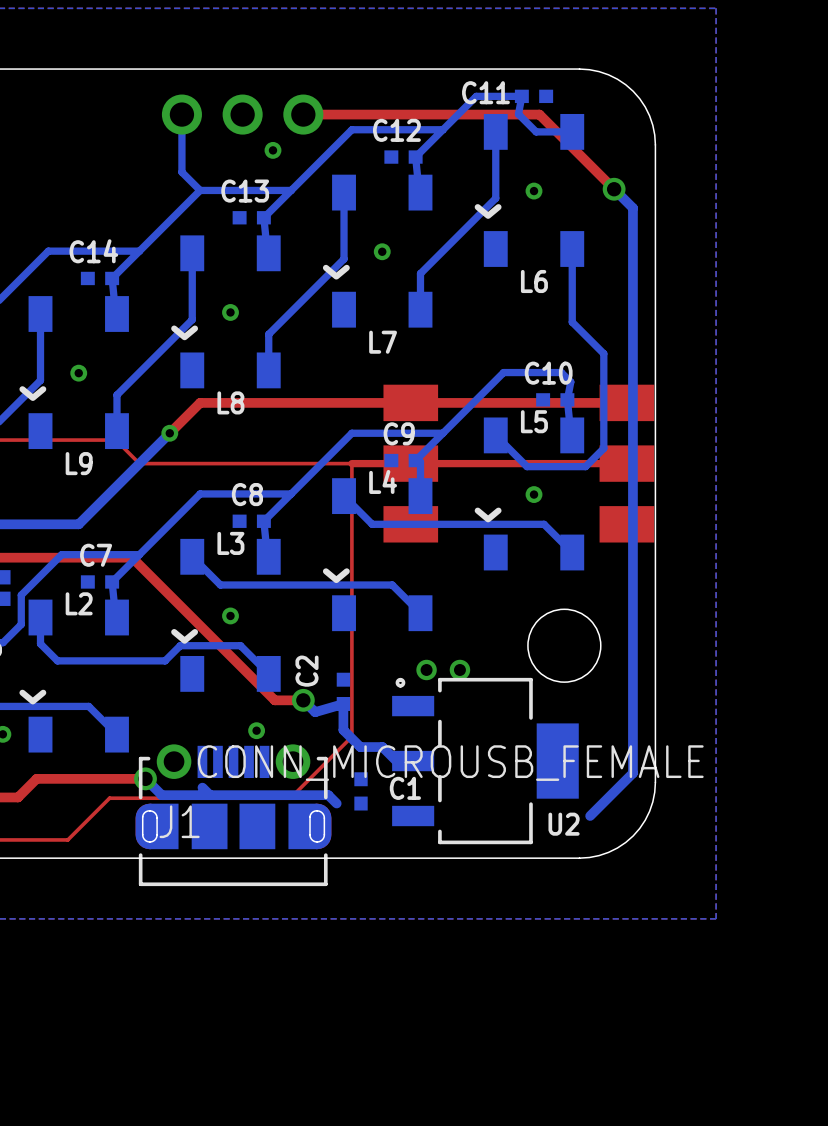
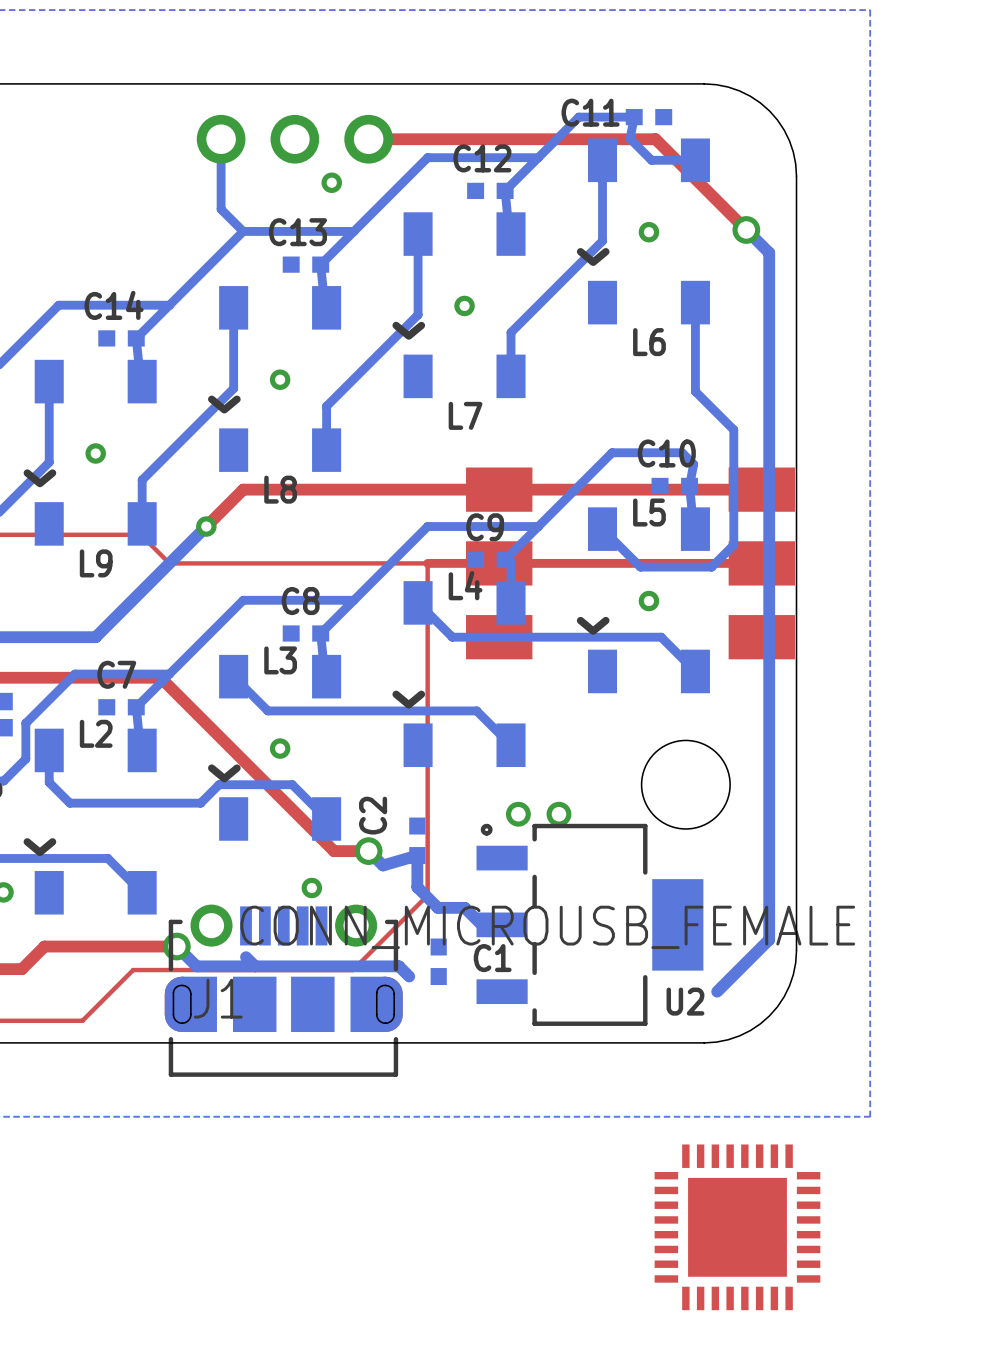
part: none -> (737, 1227)

